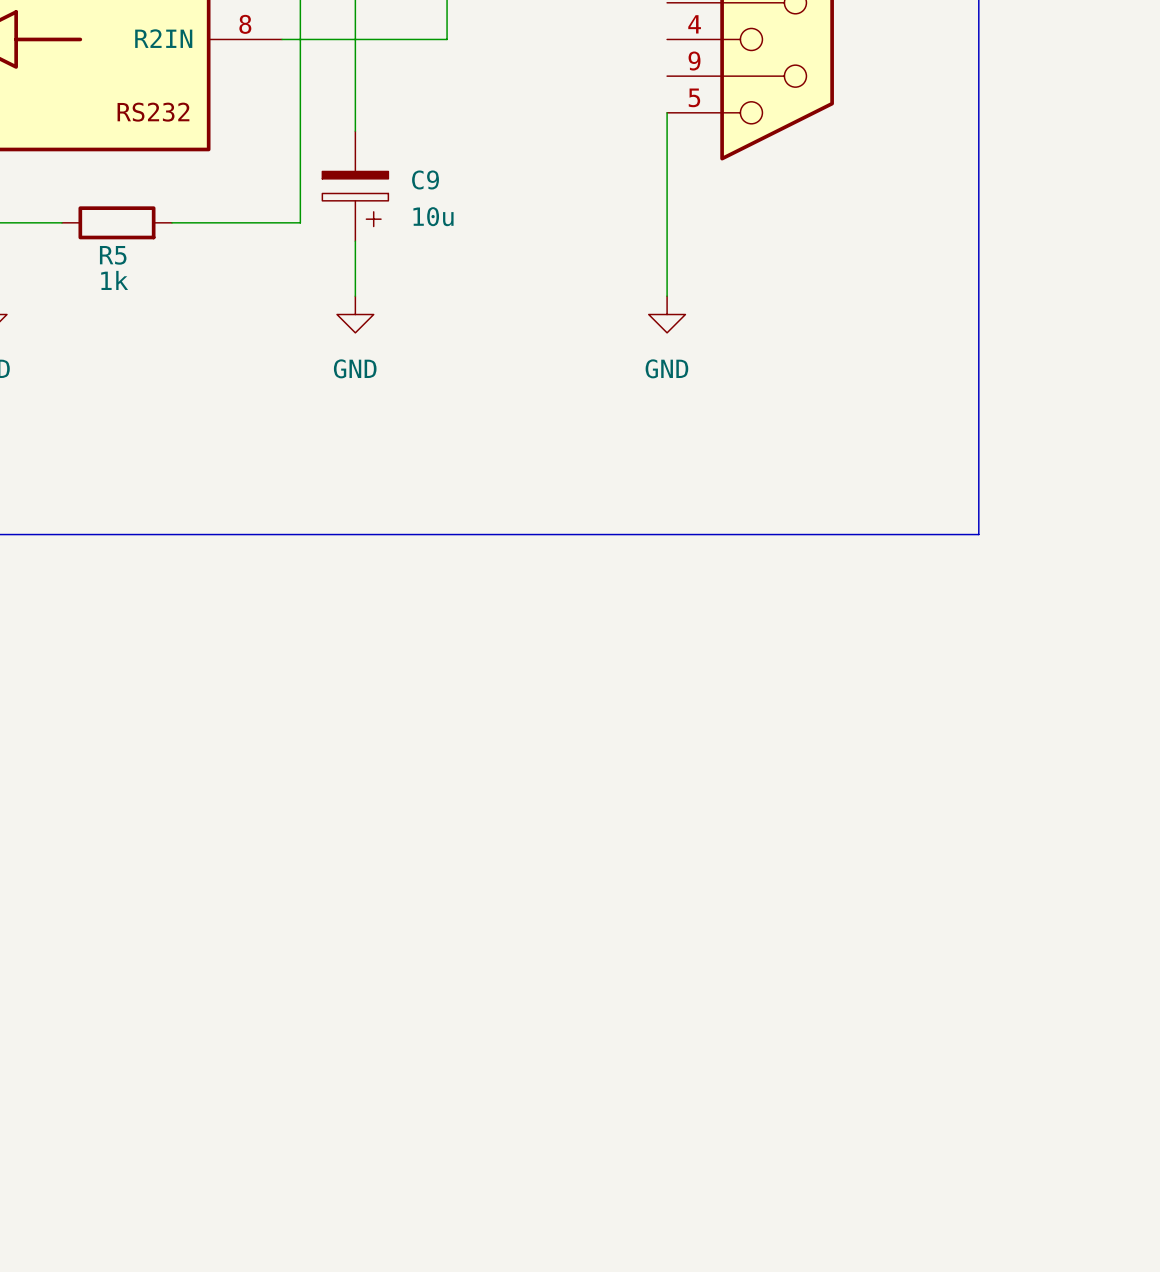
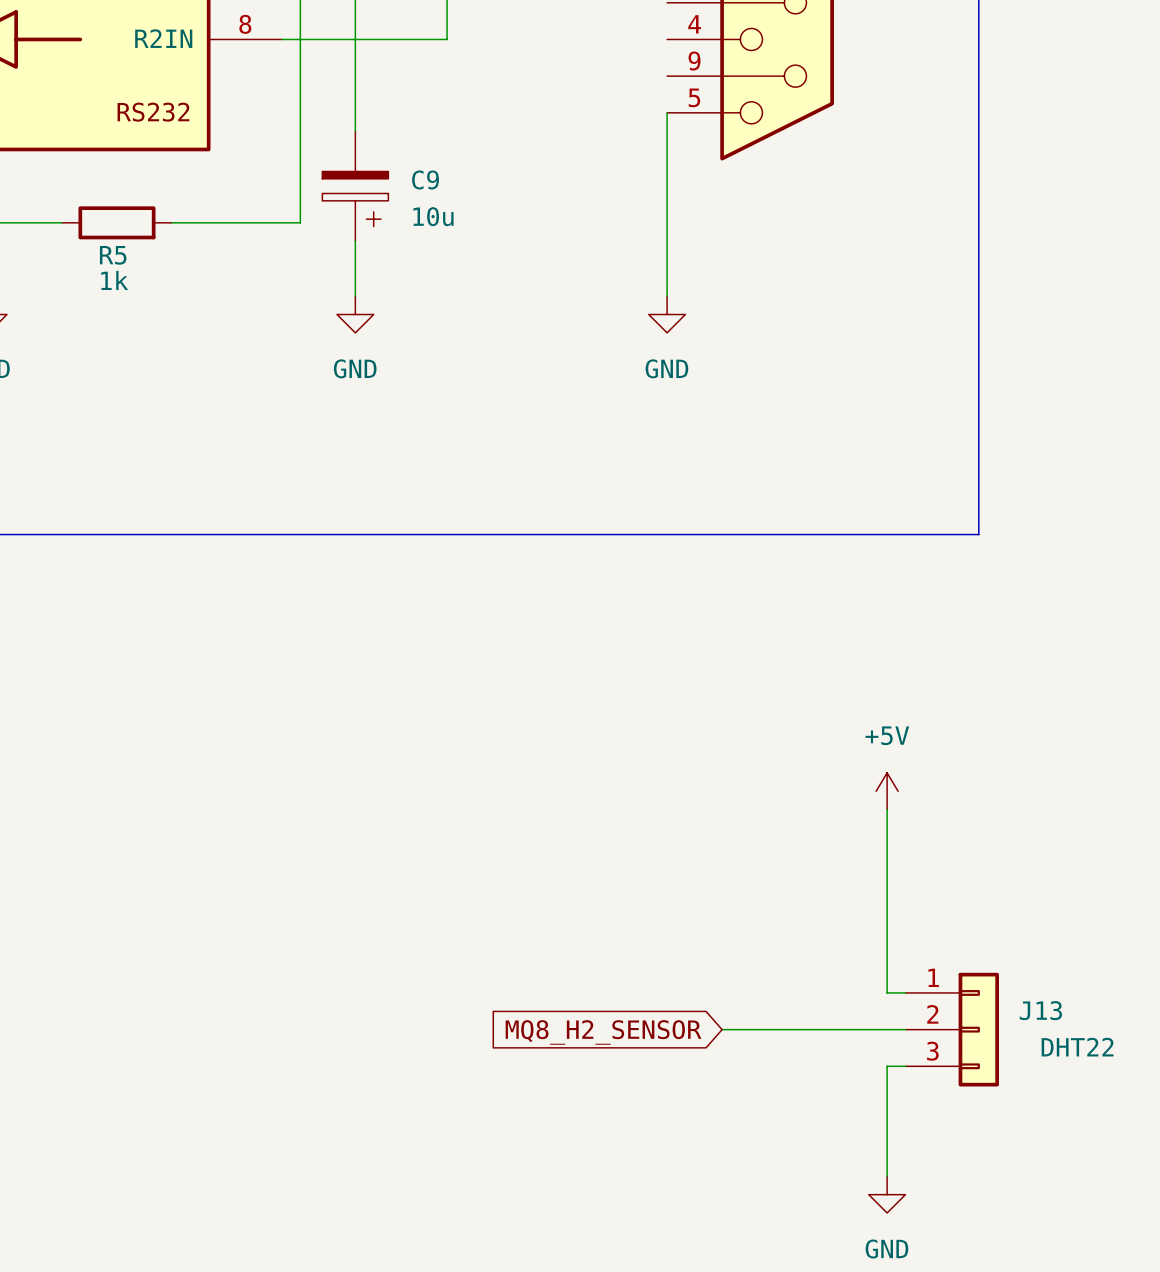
power symbol: none -> +5V (887, 791)
wire: none -> (887, 809) (887, 992) (905, 992)
wire: none -> (722, 1029) (905, 1029)
J13: none -> DHT22 (952, 1029)
global label: none -> MQ8_H2_SENSOR (603, 1032)
wire: none -> (905, 1066) (887, 1066) (887, 1176)
power symbol: none -> GND (887, 1194)

